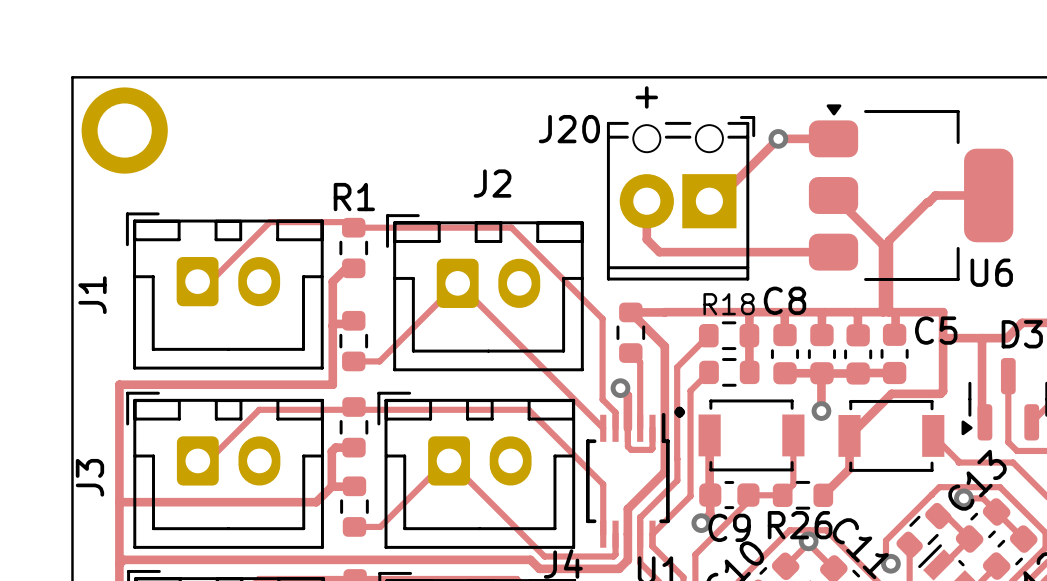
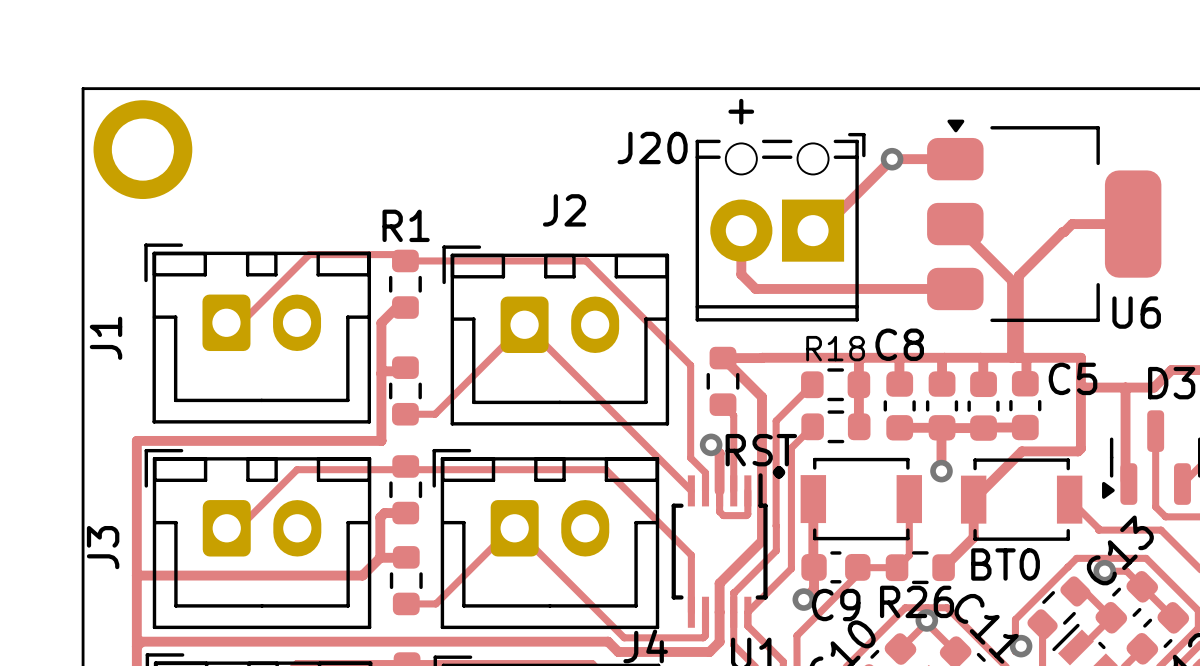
text: none -> RST (761, 450)
text: none -> BT0 (1005, 564)

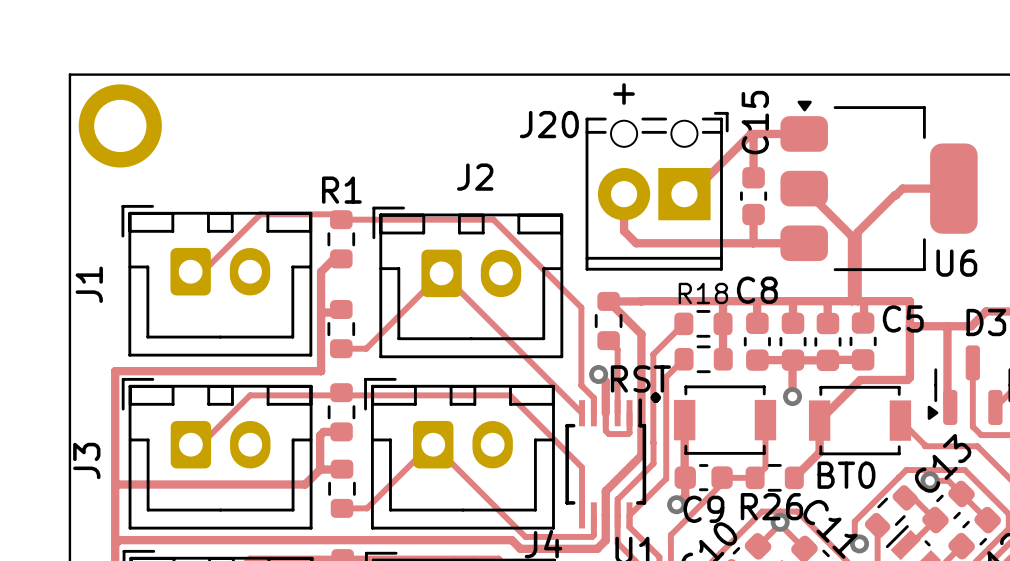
track: none -> (750, 134) (753, 136) (753, 177)
via: (892, 159) -> none
C15: none -> (753, 196)
track: none -> (753, 214) (753, 243)

